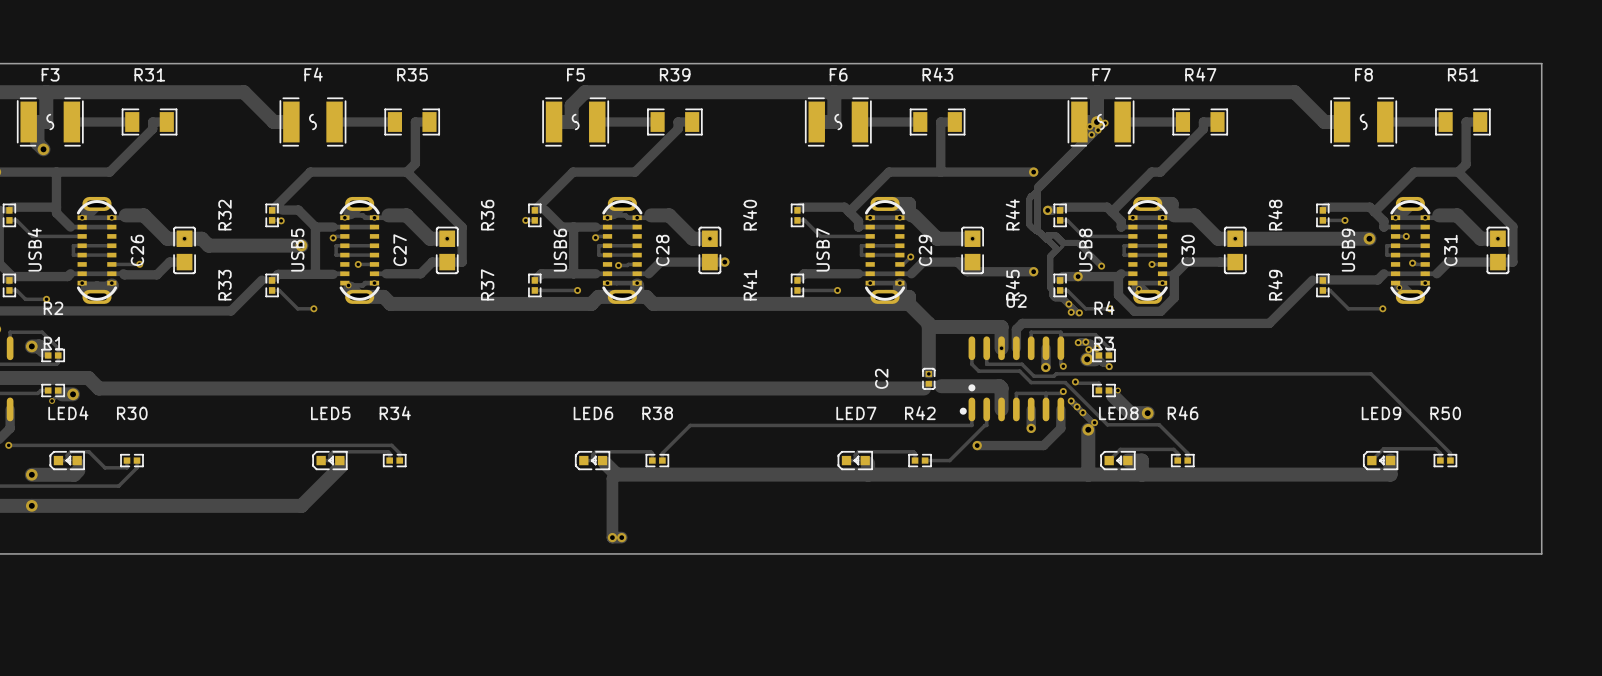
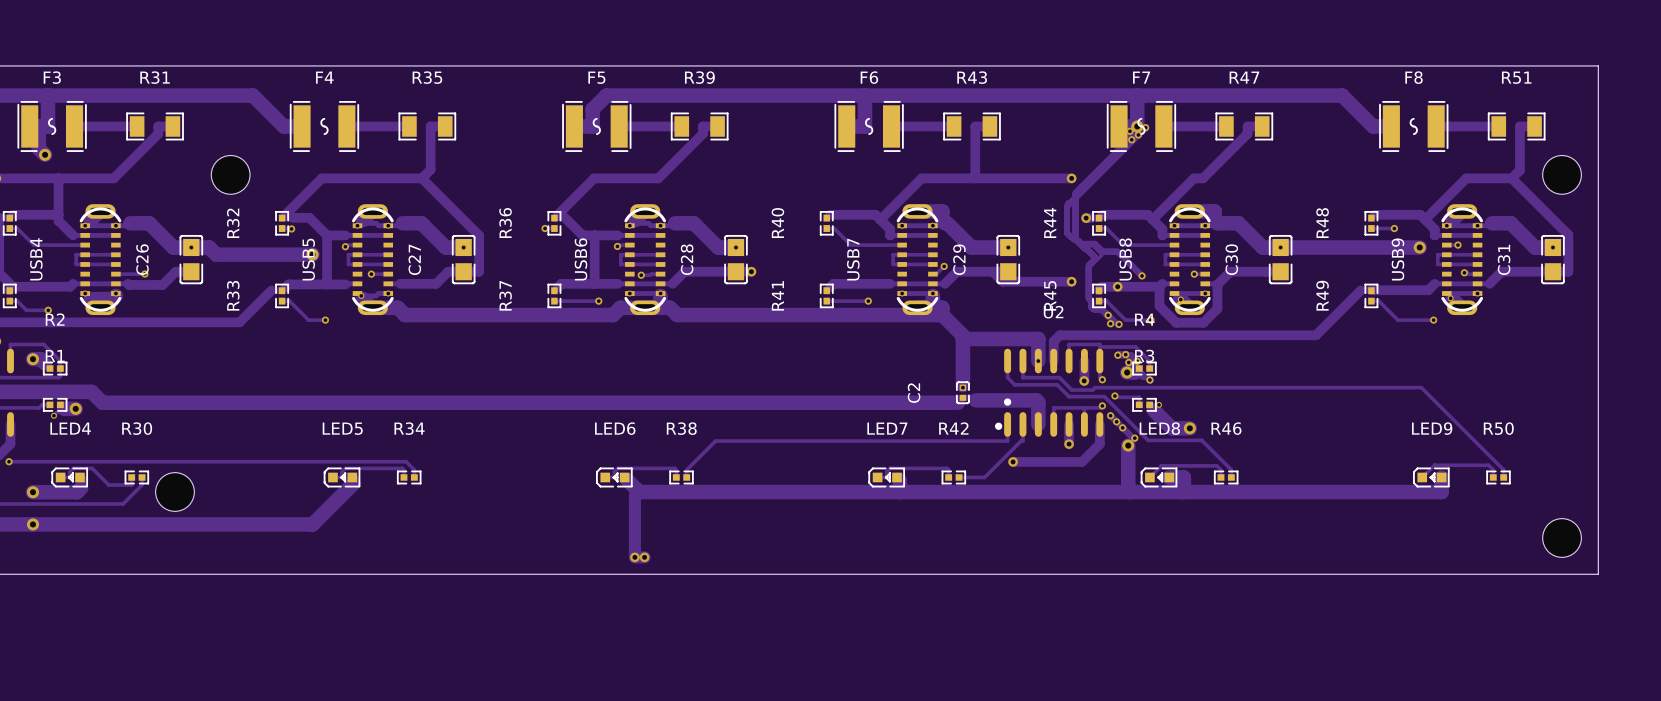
part: none -> (230, 174)
part: none -> (1562, 174)
part: none -> (174, 492)
part: none -> (1562, 537)

